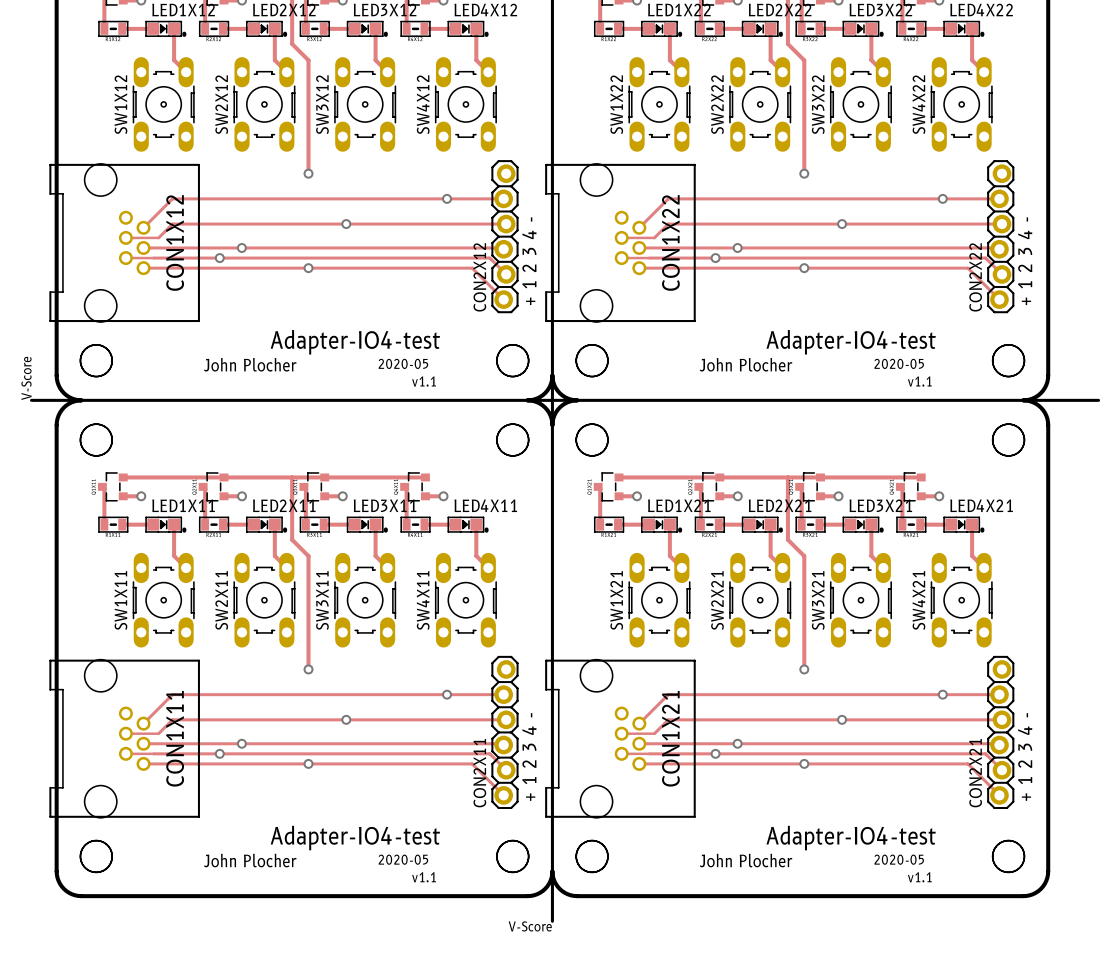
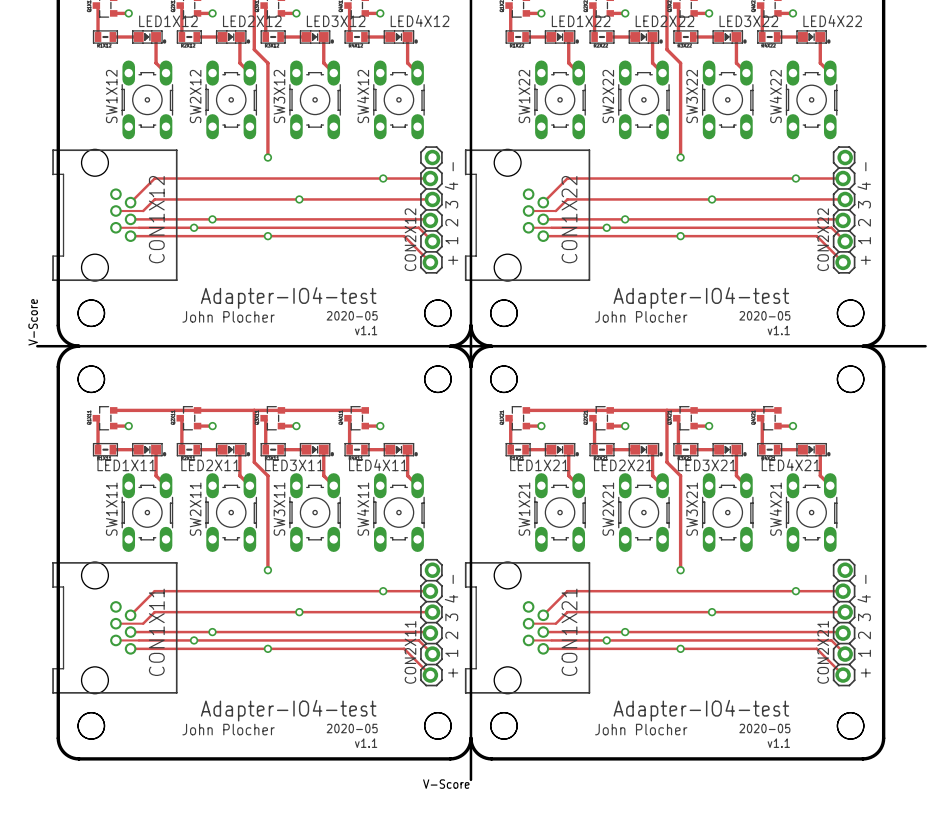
LED1X11 name position: LED1X11 (183, 505) -> LED1X11 (126, 465)
LED2X11 name position: LED2X11 (284, 505) -> LED2X11 (210, 465)
LED3X11 name position: LED3X11 (385, 505) -> LED3X11 (294, 465)
LED4X11 name position: LED4X11 (485, 505) -> LED4X11 (378, 465)
LED1X21 name position: LED1X21 (679, 505) -> LED1X21 (539, 465)
LED2X21 name position: LED2X21 (780, 505) -> LED2X21 (623, 465)
LED3X21 name position: LED3X21 (880, 505) -> LED3X21 (707, 465)
LED4X21 name position: LED4X21 (981, 505) -> LED4X21 (791, 465)

